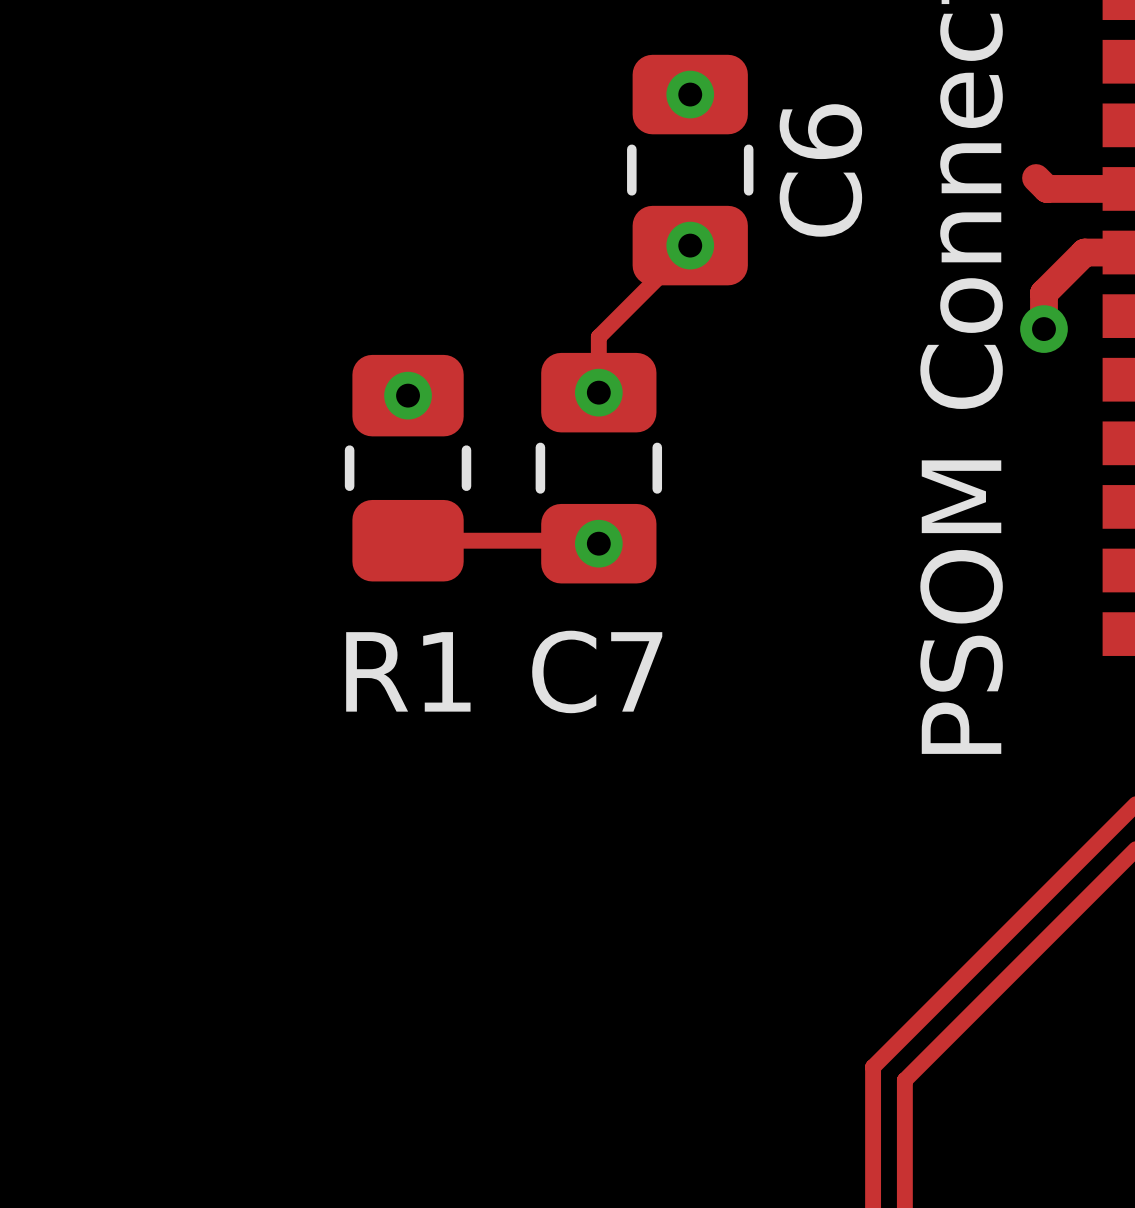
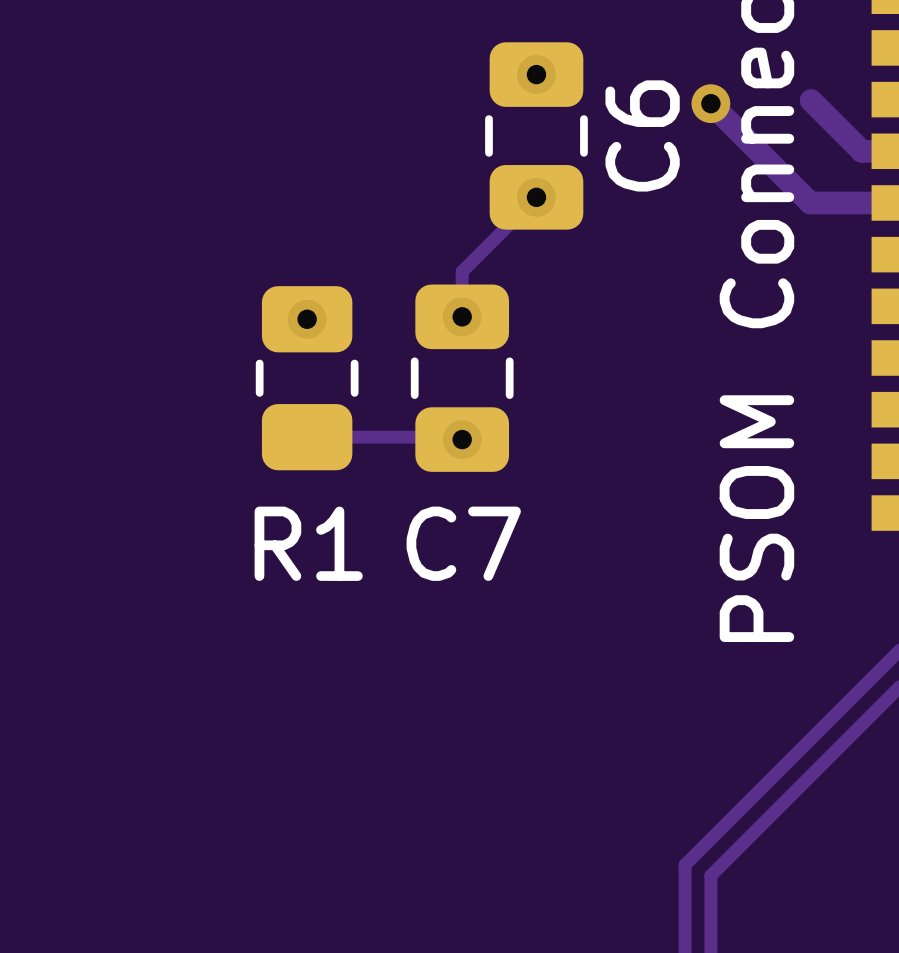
via: none -> (710, 103)
track: (1036, 178) (1046, 188) (1090, 188) -> (811, 100) (861, 151)
track: (1084, 252) (1043, 293) (1043, 329) -> (857, 202) (810, 202) (710, 103)
via: (1043, 329) -> none

